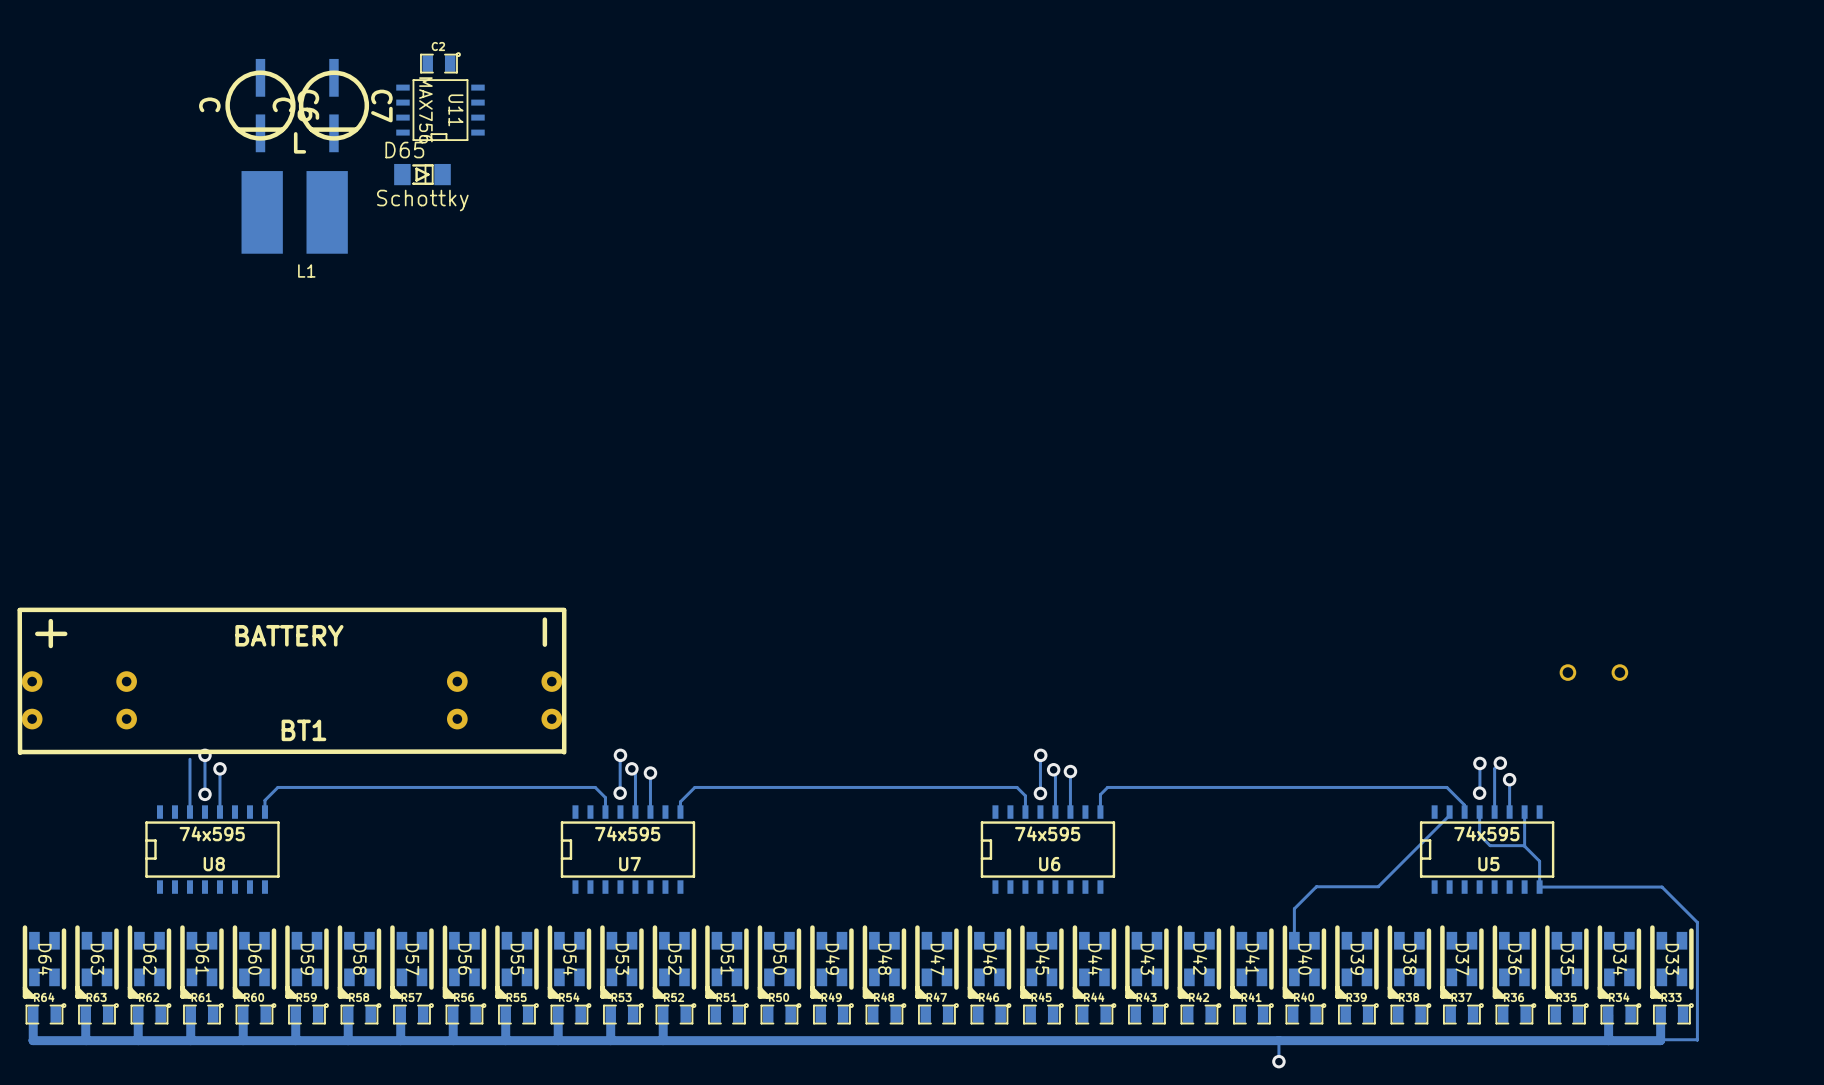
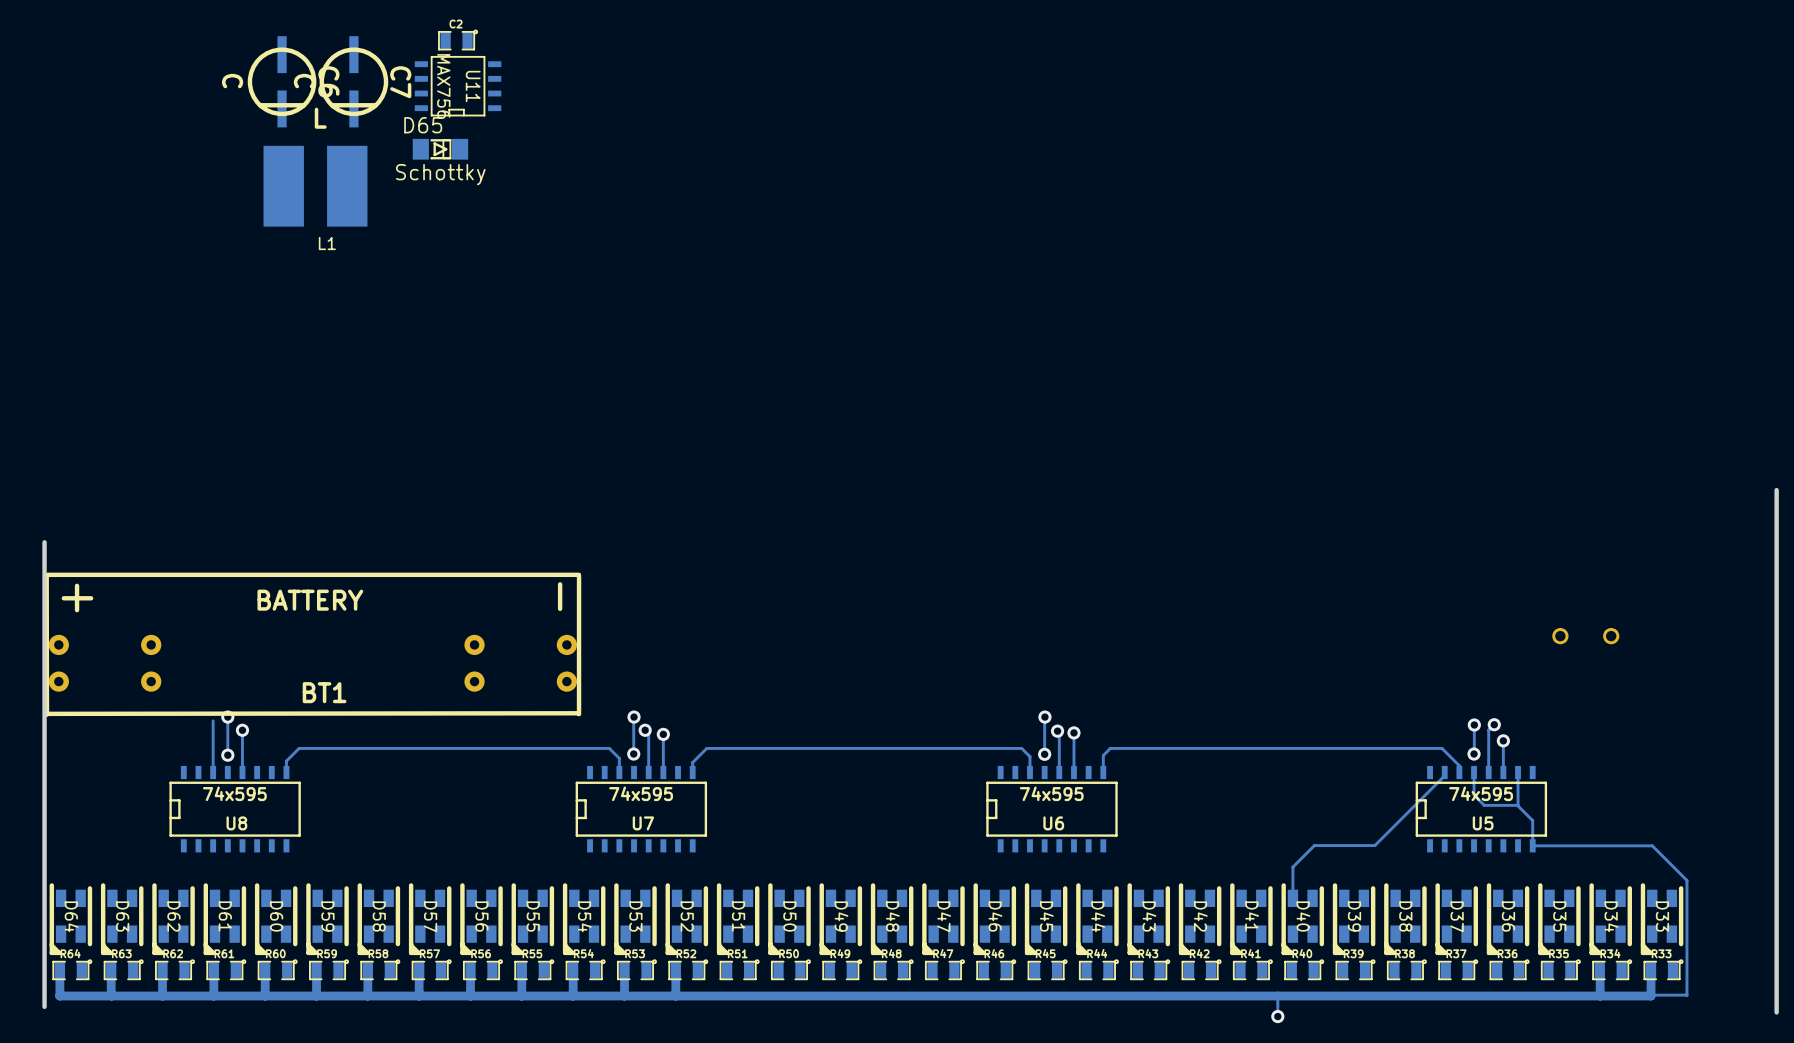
board edge: none -> (1776, 490) (1776, 1012)
board edge: none -> (44, 542) (44, 1006)

